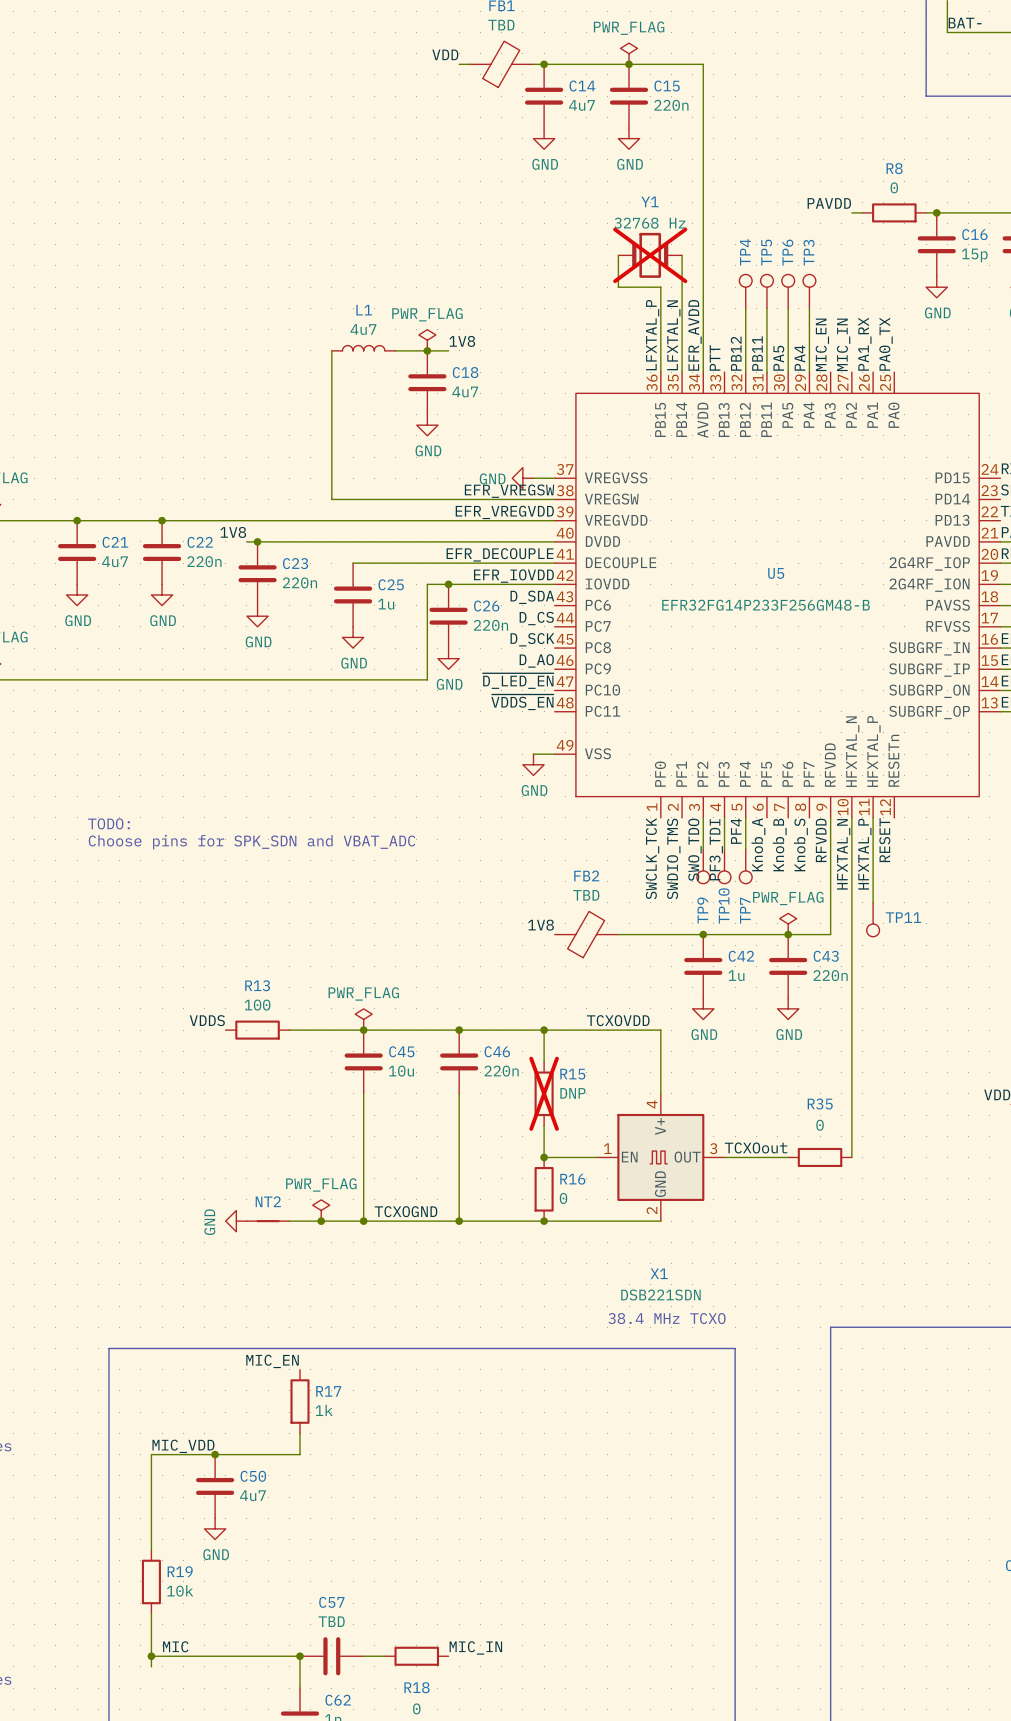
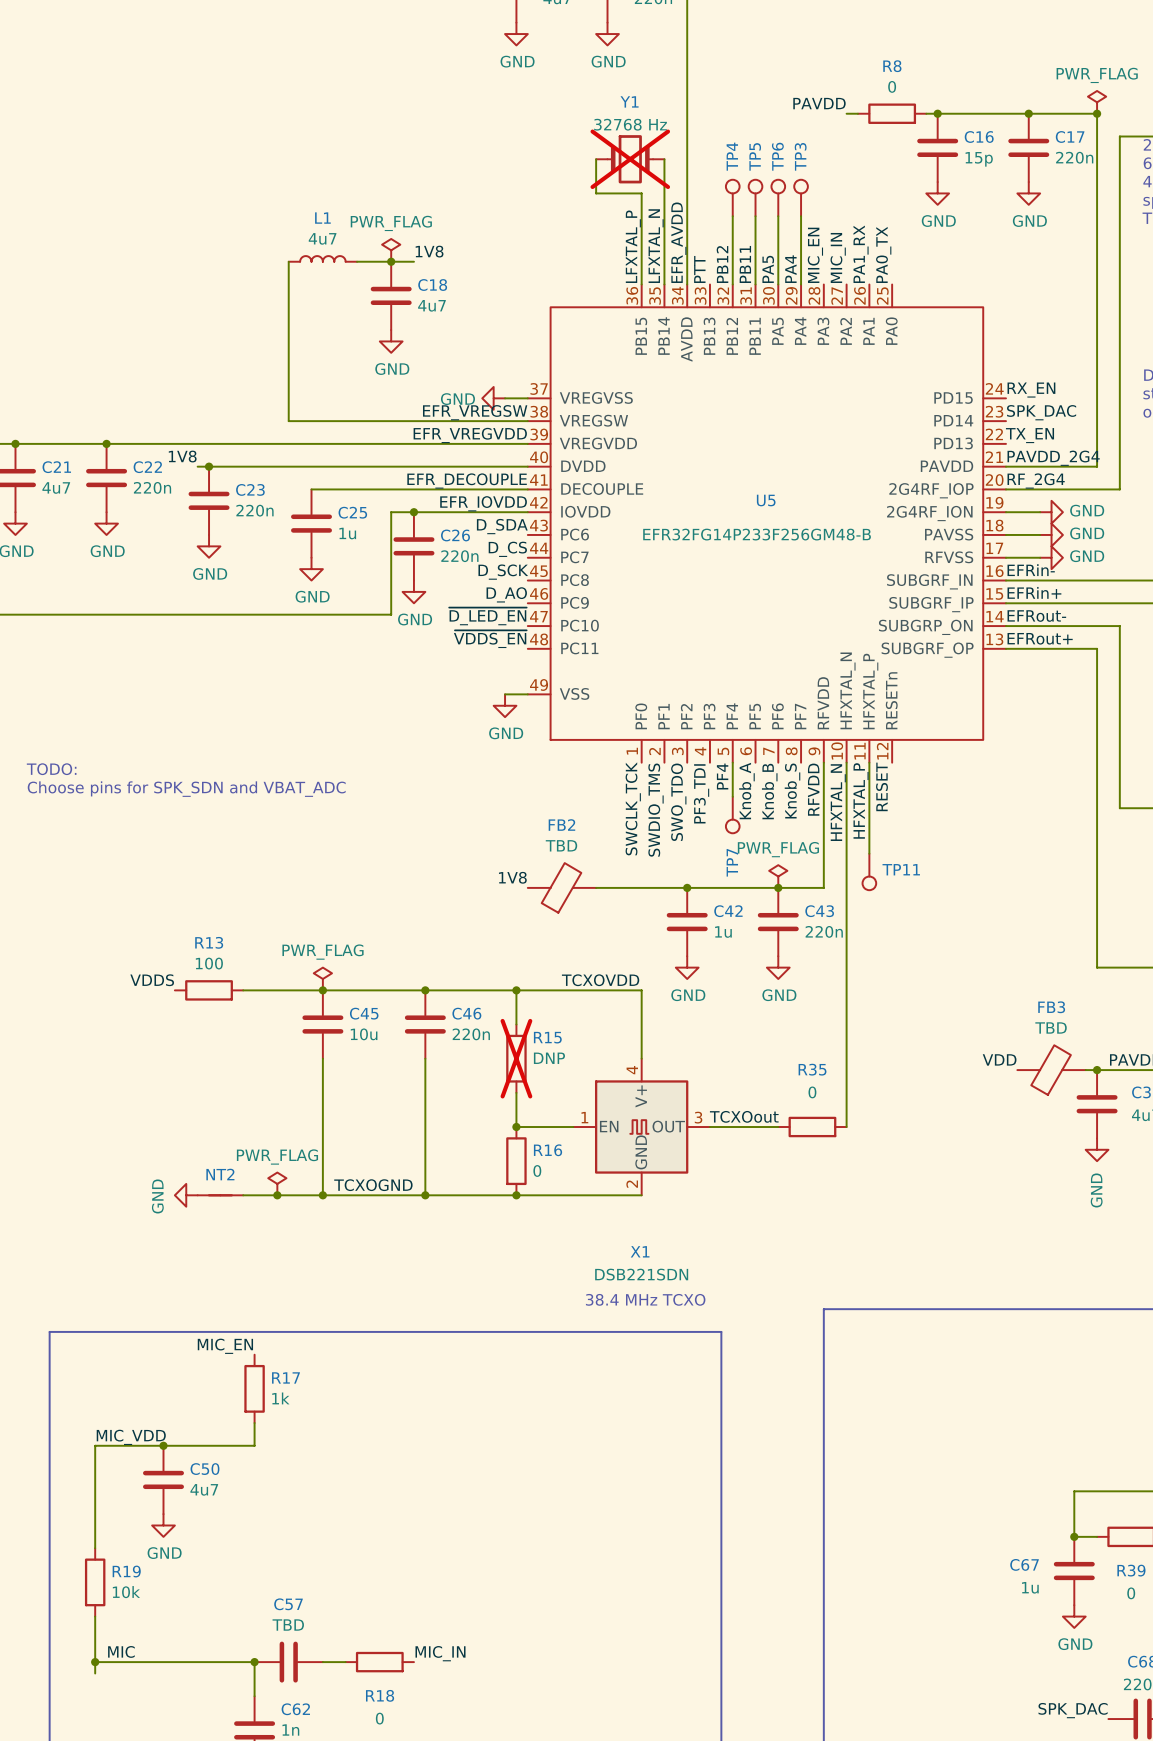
wire: (703, 817) (703, 849) -> none
wire: (724, 817) (724, 849) -> none
TP9: (703, 866) -> none
TP10: (724, 866) -> none

